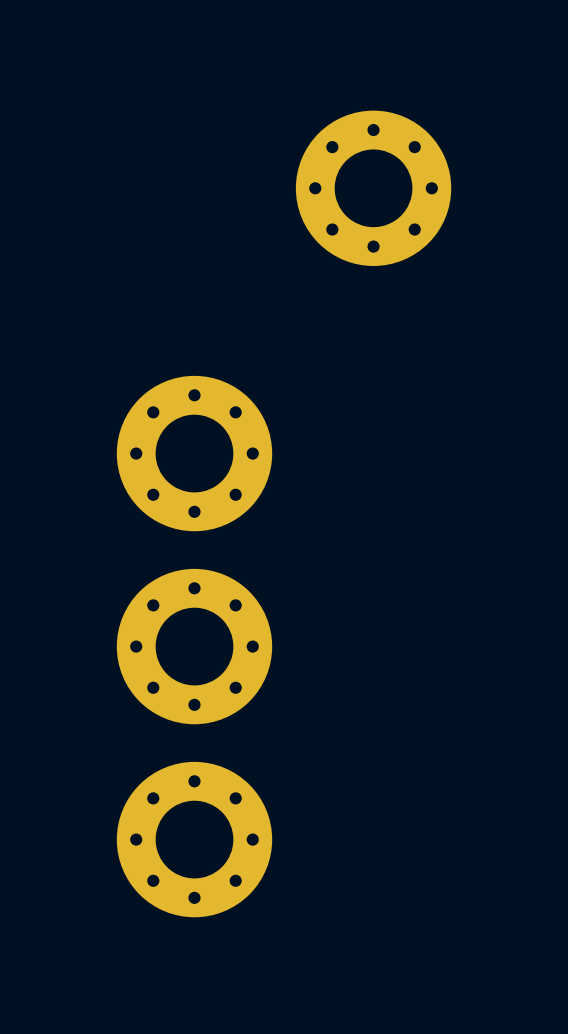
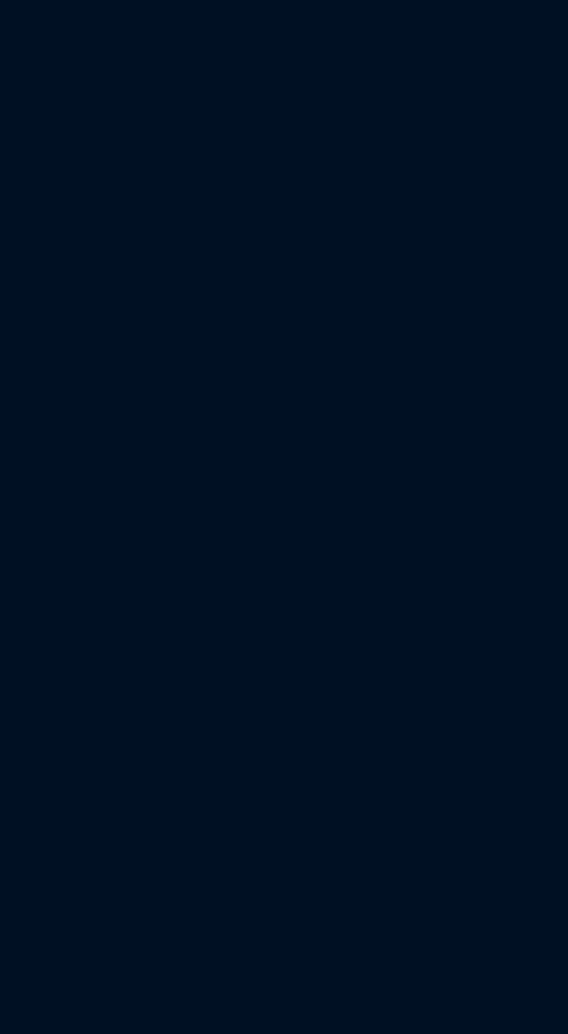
part: (373, 188) -> none
part: (194, 453) -> none
part: (194, 646) -> none
part: (194, 839) -> none

